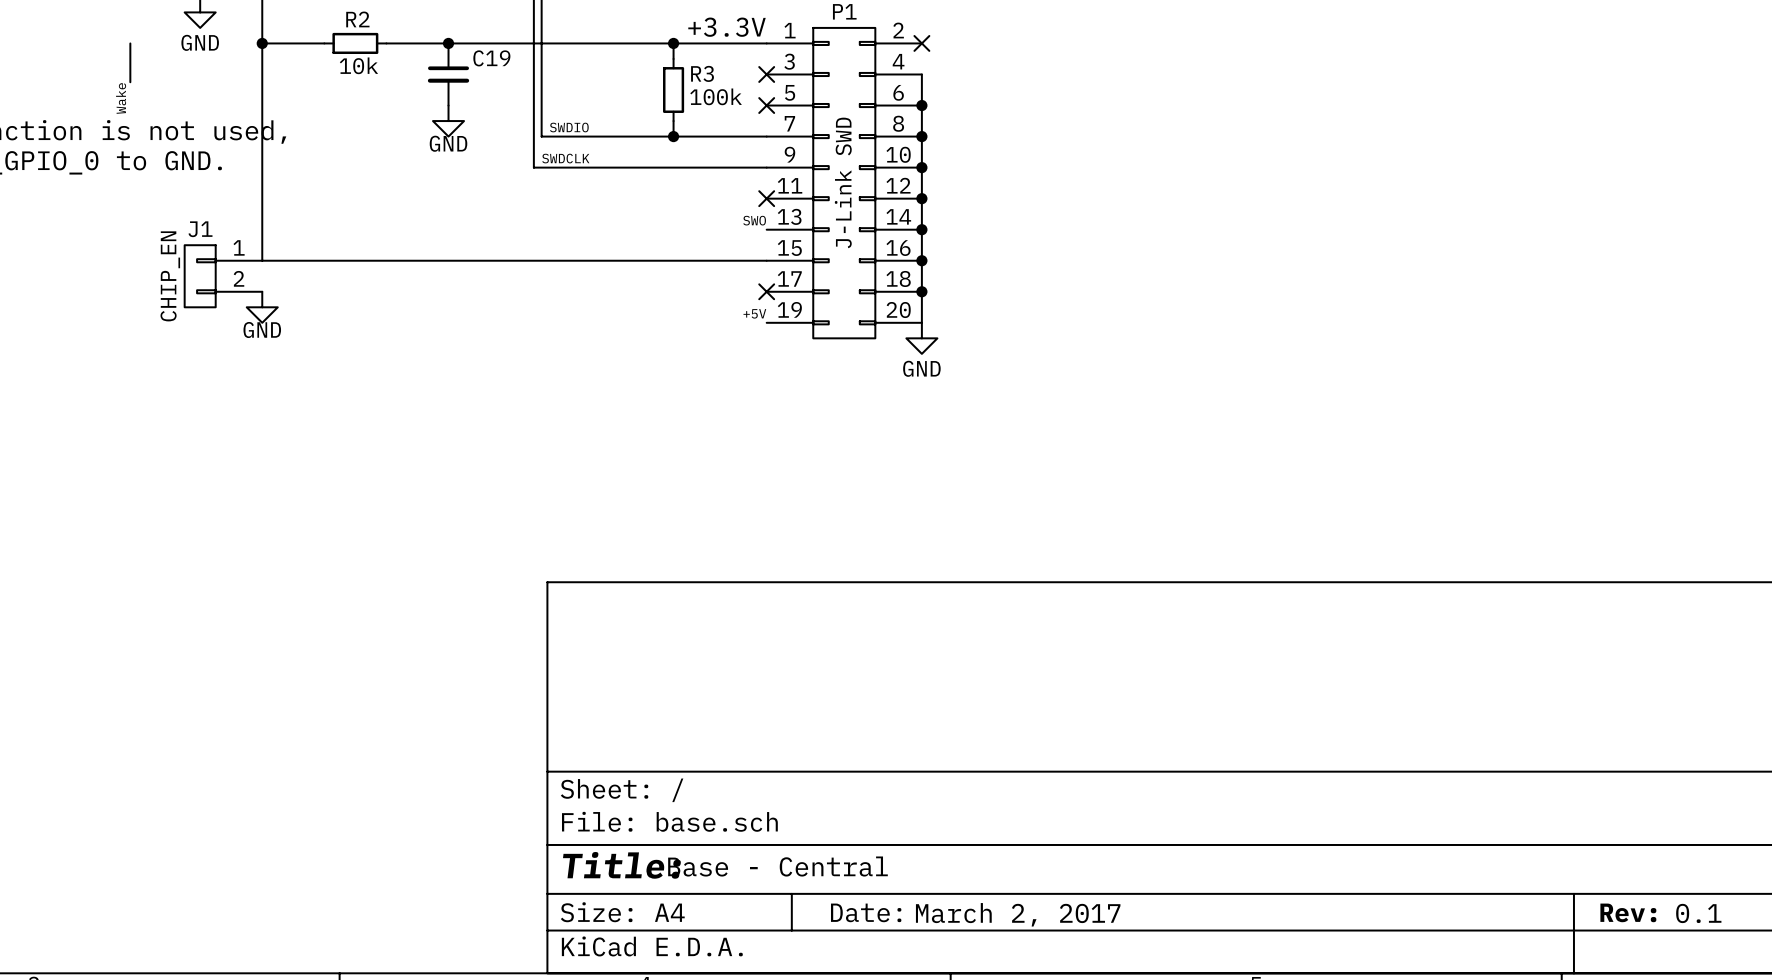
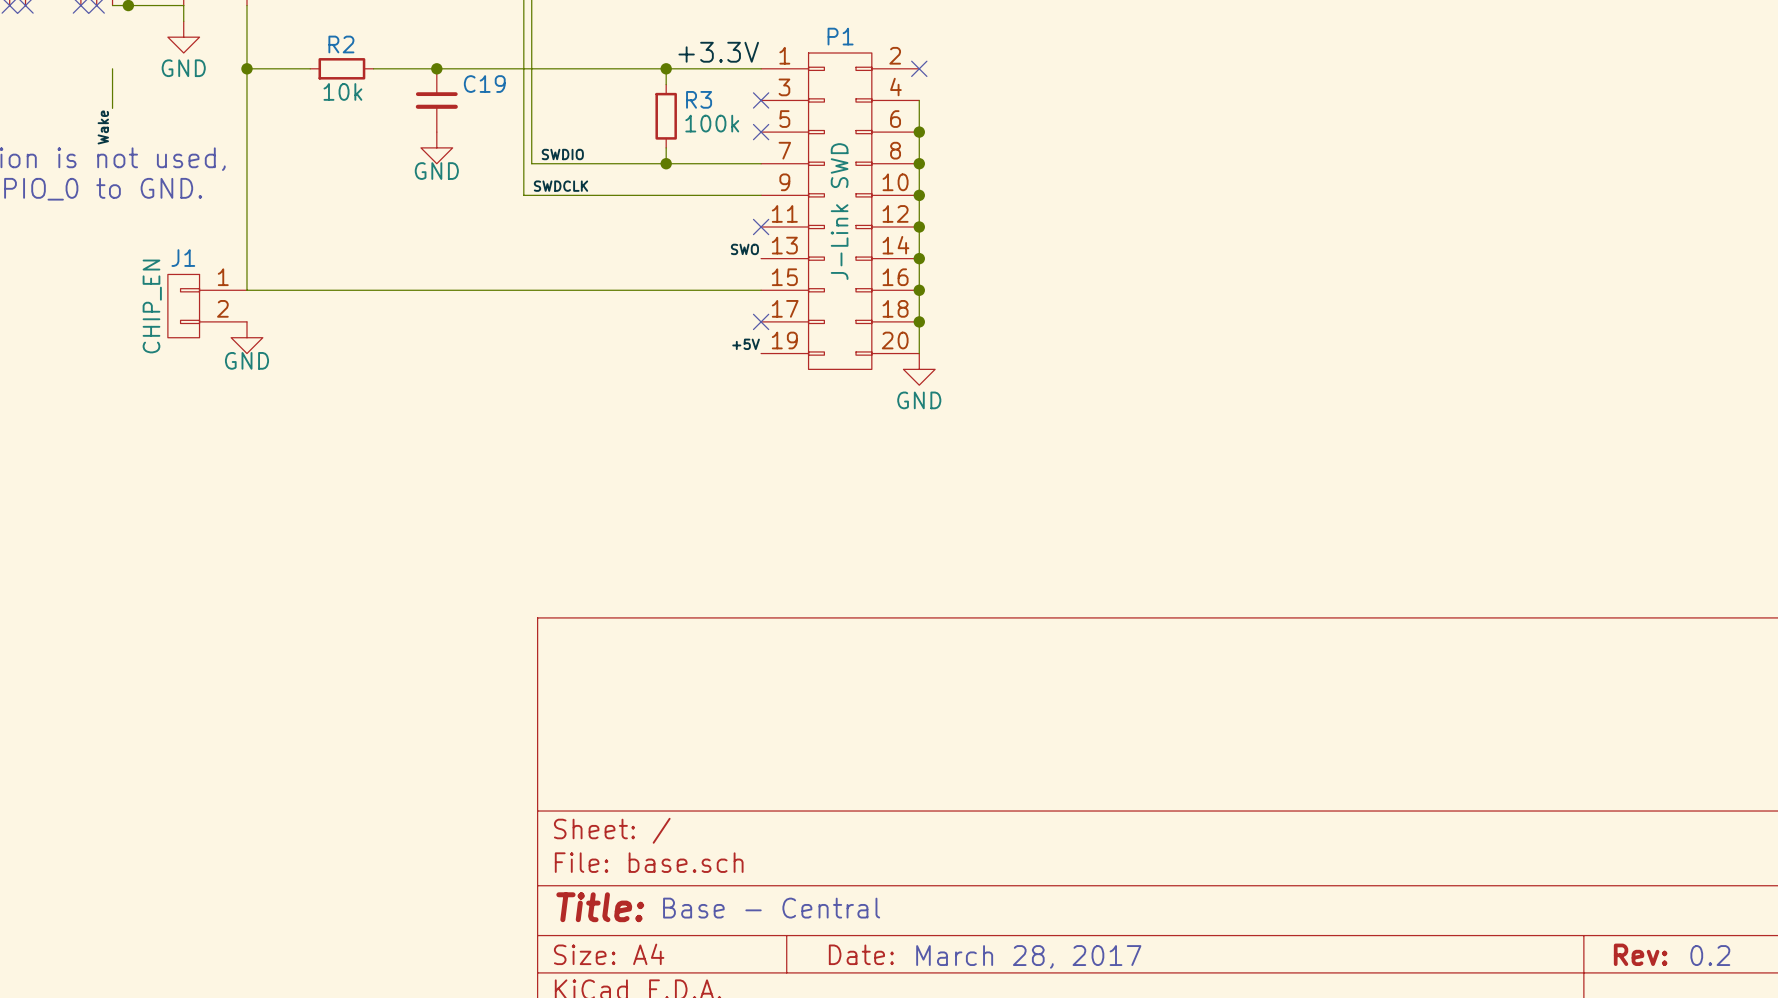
text: 0.1 (1698, 913) -> 0.2 (1710, 955)
text: March 2, 2017 (1018, 914) -> March 28, 2017 (1028, 956)

